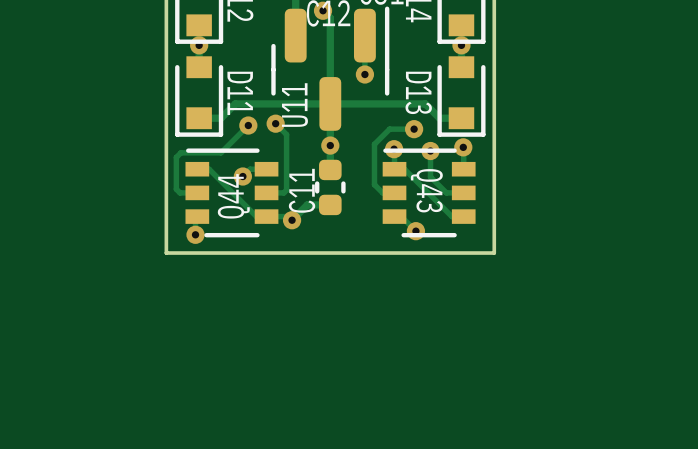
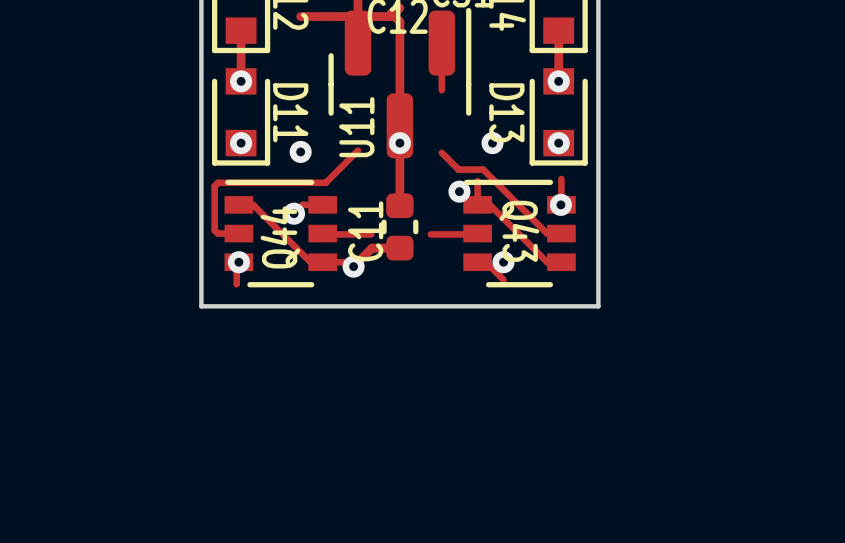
track: none -> (399, 8) (391, 16) (300, 16)
via: (323, 10) -> none
via position: (199, 45) -> (241, 81)
via position: (461, 45) -> (558, 81)
via: (364, 74) -> none
track: (199, 118) (221, 118) (235, 103) (425, 103) (439, 118) (461, 118) -> none
via: none -> (241, 143)
via: none -> (399, 143)
via: none -> (558, 143)
track: (275, 123) (286, 134) (286, 190) (283, 192) (266, 192) -> (371, 234) (323, 234)
via: (275, 123) -> none
track: (248, 125) (221, 152) (180, 152) (176, 157) (177, 190) -> (358, 150) (325, 182) (217, 182) (214, 186) (214, 230)
track: (414, 129) (389, 129) (374, 144) (374, 184) (382, 192) (394, 192) -> (430, 234) (476, 234)
via position: (414, 129) -> (492, 143)
via: (330, 145) -> none
via: (463, 147) -> none
via position: (394, 149) -> (459, 191)
track: (430, 151) (430, 176) (446, 192) (451, 192) -> (441, 152) (458, 169) (483, 169) (547, 233)
via: (430, 151) -> none
via: none -> (560, 204)
via position: (415, 231) -> (503, 262)
via position: (195, 234) -> (238, 262)

